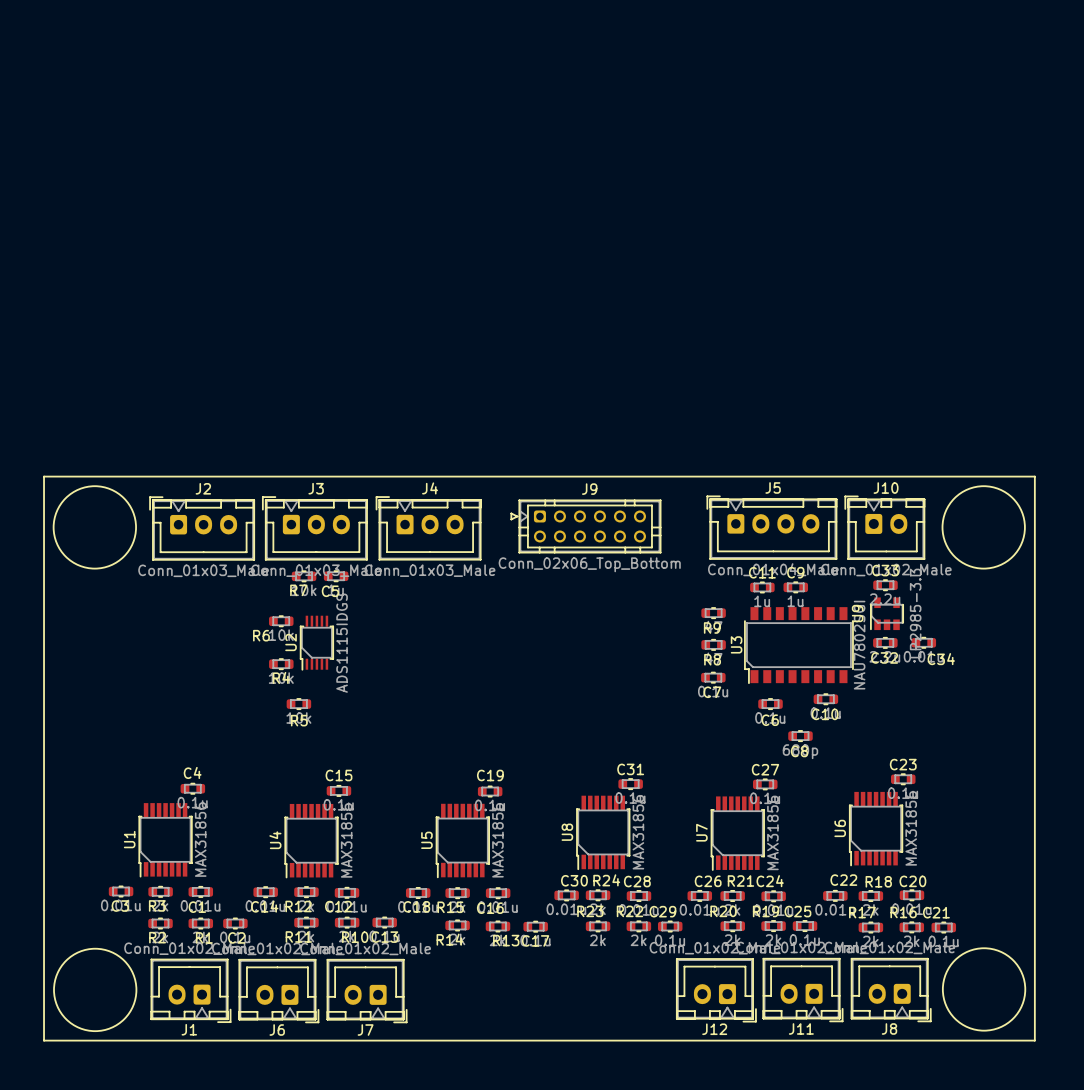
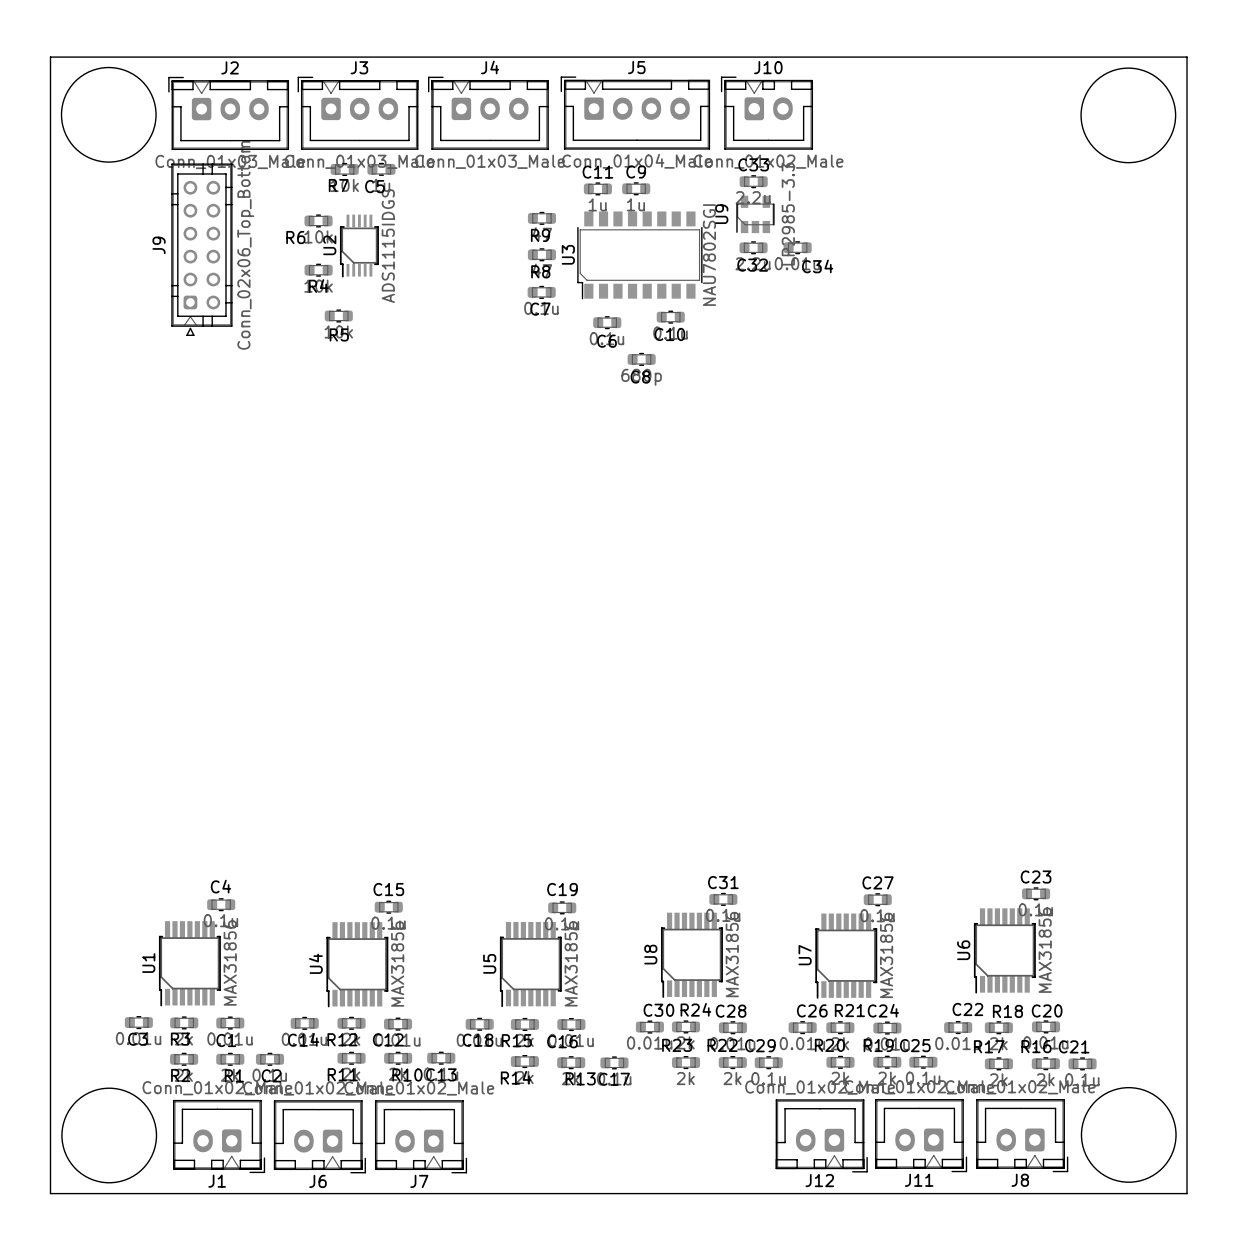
drawing: none -> [60, 66, 157, 163]
drawing: none -> [1080, 67, 1177, 164]
line: (44, 476) (1034, 476) -> (50, 546) (50, 57) (1187, 57) (1187, 546)
drawing: [53, 485, 137, 570] -> none
drawing: [941, 485, 1026, 570] -> none
J9 rotation: 0° (585, 526) -> 90° counterclockwise (201, 249)
J9 position: (585, 526) -> (201, 249)
J5 position: (771, 527) -> (635, 113)
J10 position: (884, 527) -> (766, 113)
J2 position: (202, 528) -> (228, 113)
J3 position: (314, 528) -> (358, 113)
J4 position: (428, 528) -> (488, 113)
R7 position: (304, 576) -> (344, 169)
C5 position: (336, 576) -> (381, 169)
C33 position: (885, 585) -> (753, 181)
C11 position: (762, 587) -> (597, 188)
C9 position: (795, 587) -> (636, 188)
R9 position: (713, 613) -> (541, 218)
U9 position: (887, 613) -> (755, 214)
R6 position: (281, 621) -> (318, 220)
C32 position: (885, 642) -> (753, 247)
C34 position: (923, 642) -> (797, 247)
U2 position: (316, 643) -> (359, 246)
R8 position: (713, 644) -> (541, 254)
U3 position: (798, 645) -> (639, 255)
R4 position: (281, 664) -> (318, 270)
C7 position: (713, 677) -> (541, 292)
C10 position: (825, 699) -> (670, 317)
R5 position: (298, 704) -> (338, 315)
C6 position: (770, 704) -> (607, 322)
C8 position: (800, 736) -> (641, 359)

